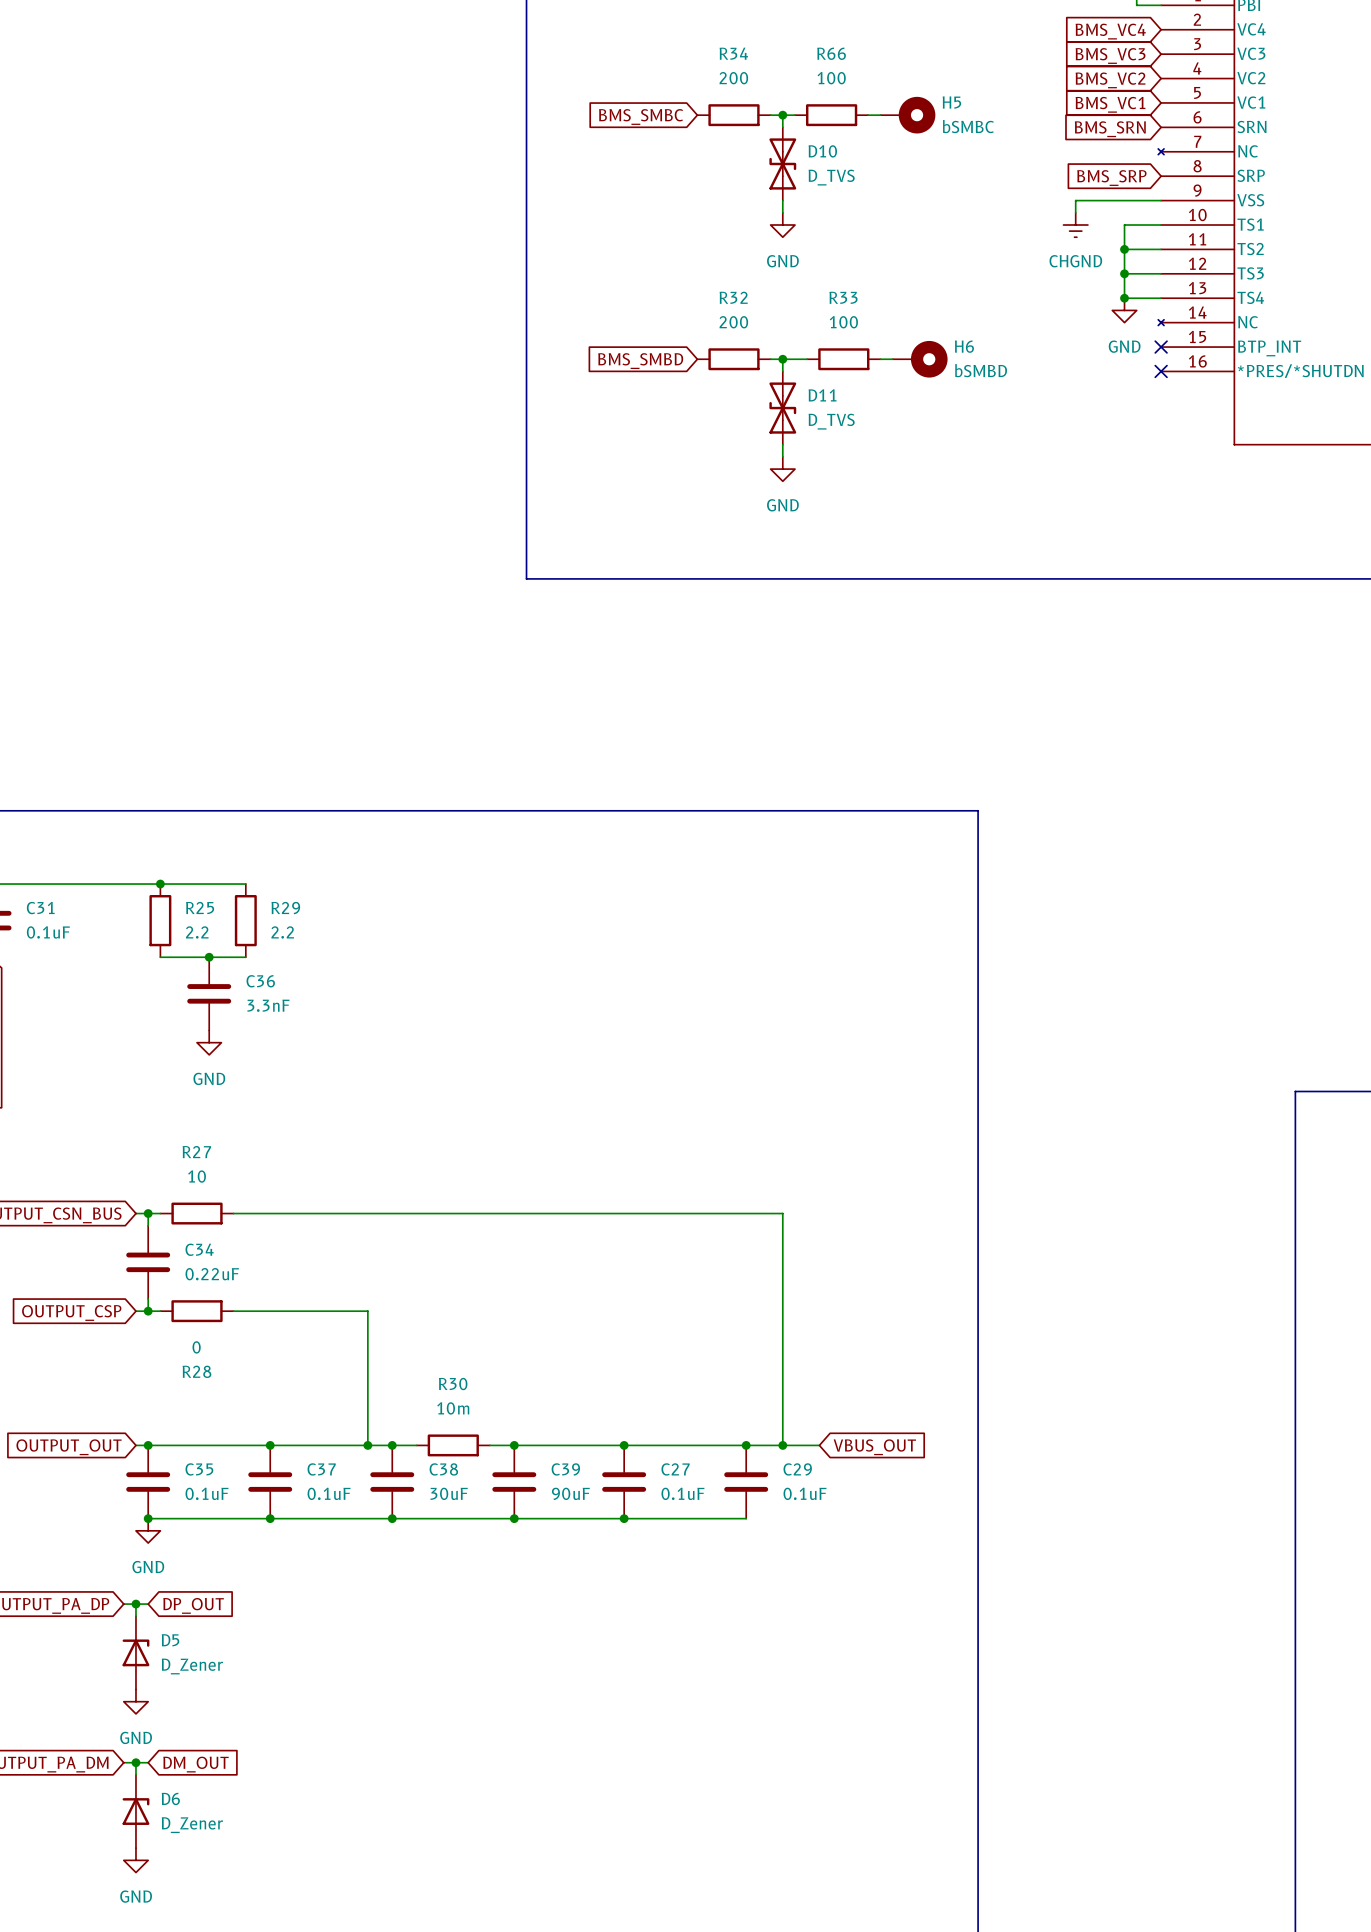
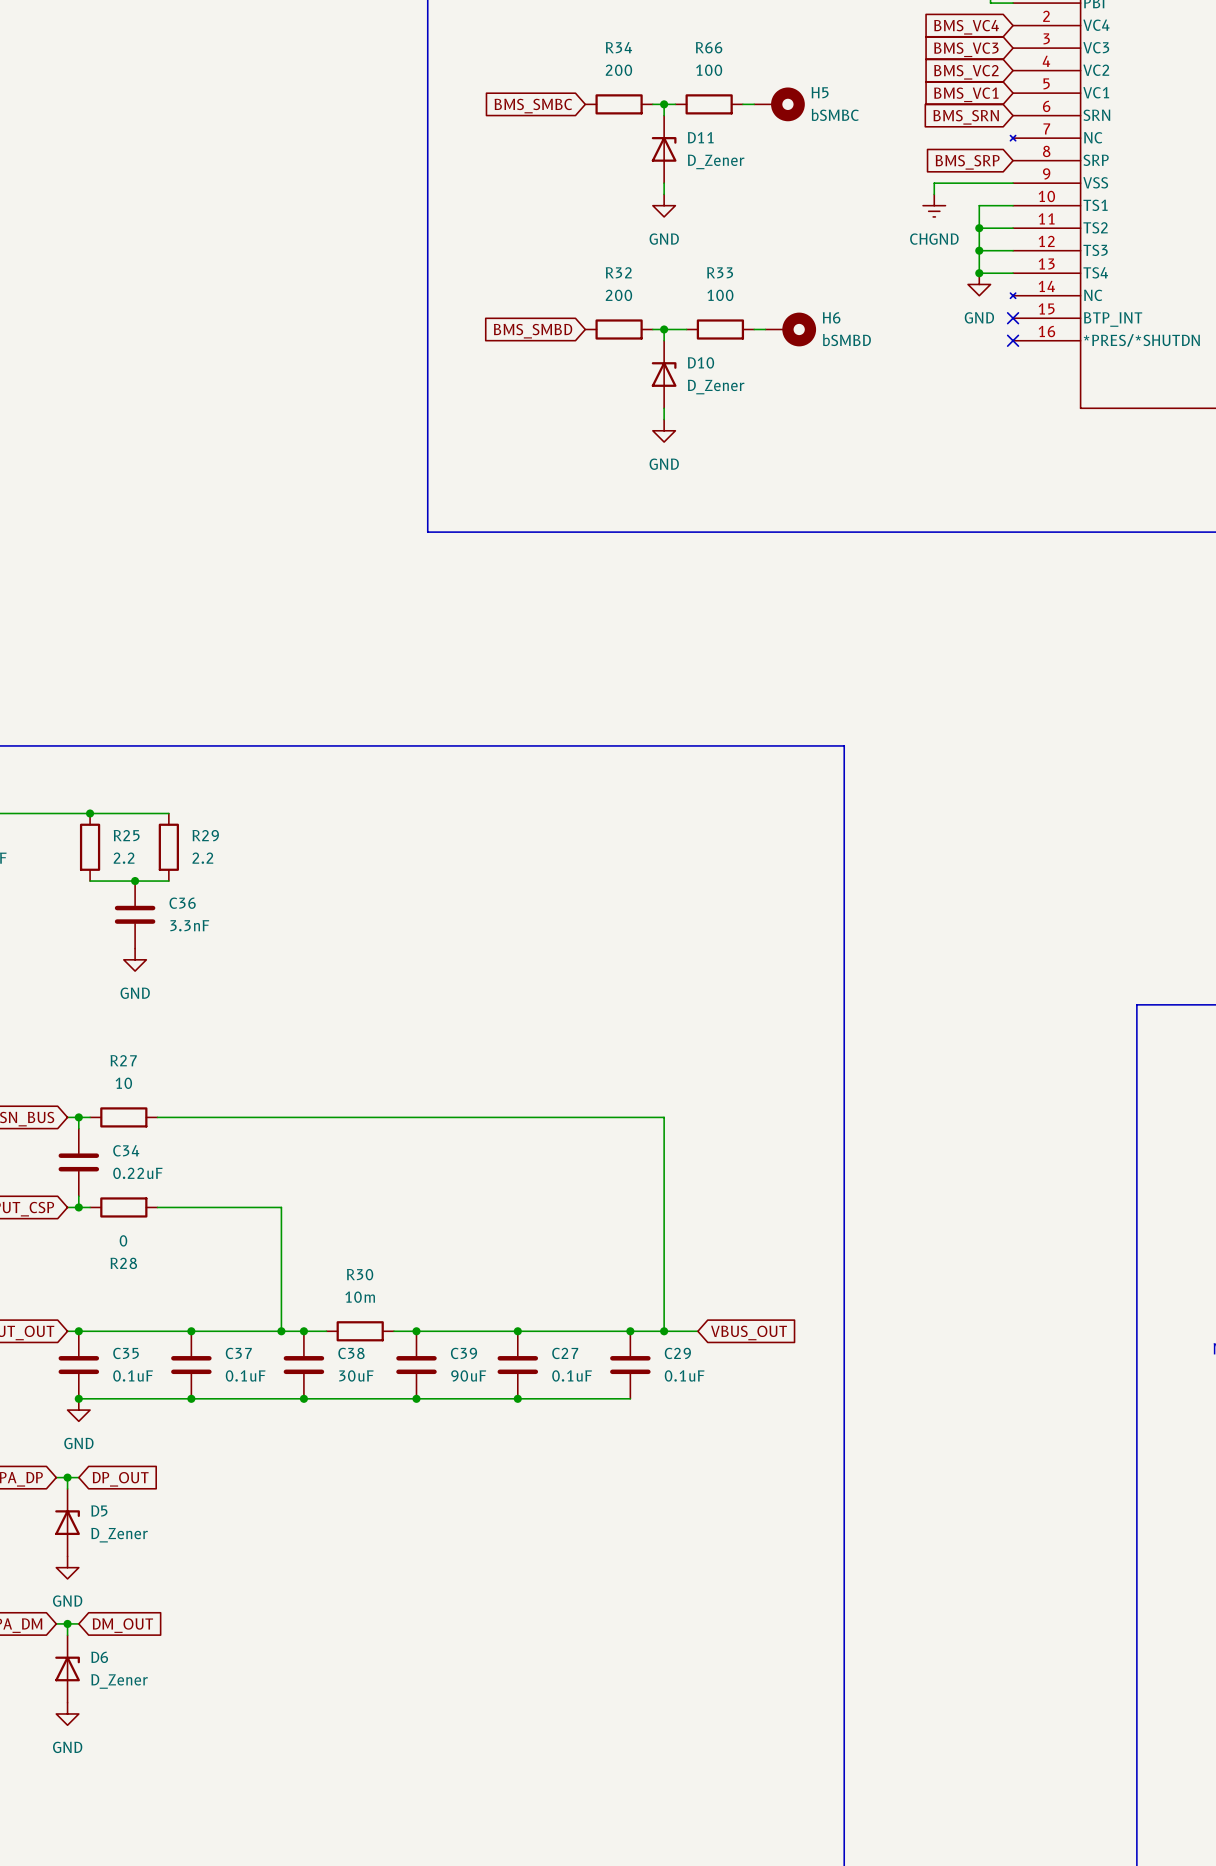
D10 symbol: [769, 127, 797, 201] -> [651, 340, 677, 409]
D10 value: D_TVS (831, 177) -> D_Zener (716, 387)
D11 symbol: [769, 371, 797, 445] -> [651, 115, 677, 184]
D11 value: D_TVS (831, 421) -> D_Zener (716, 161)

